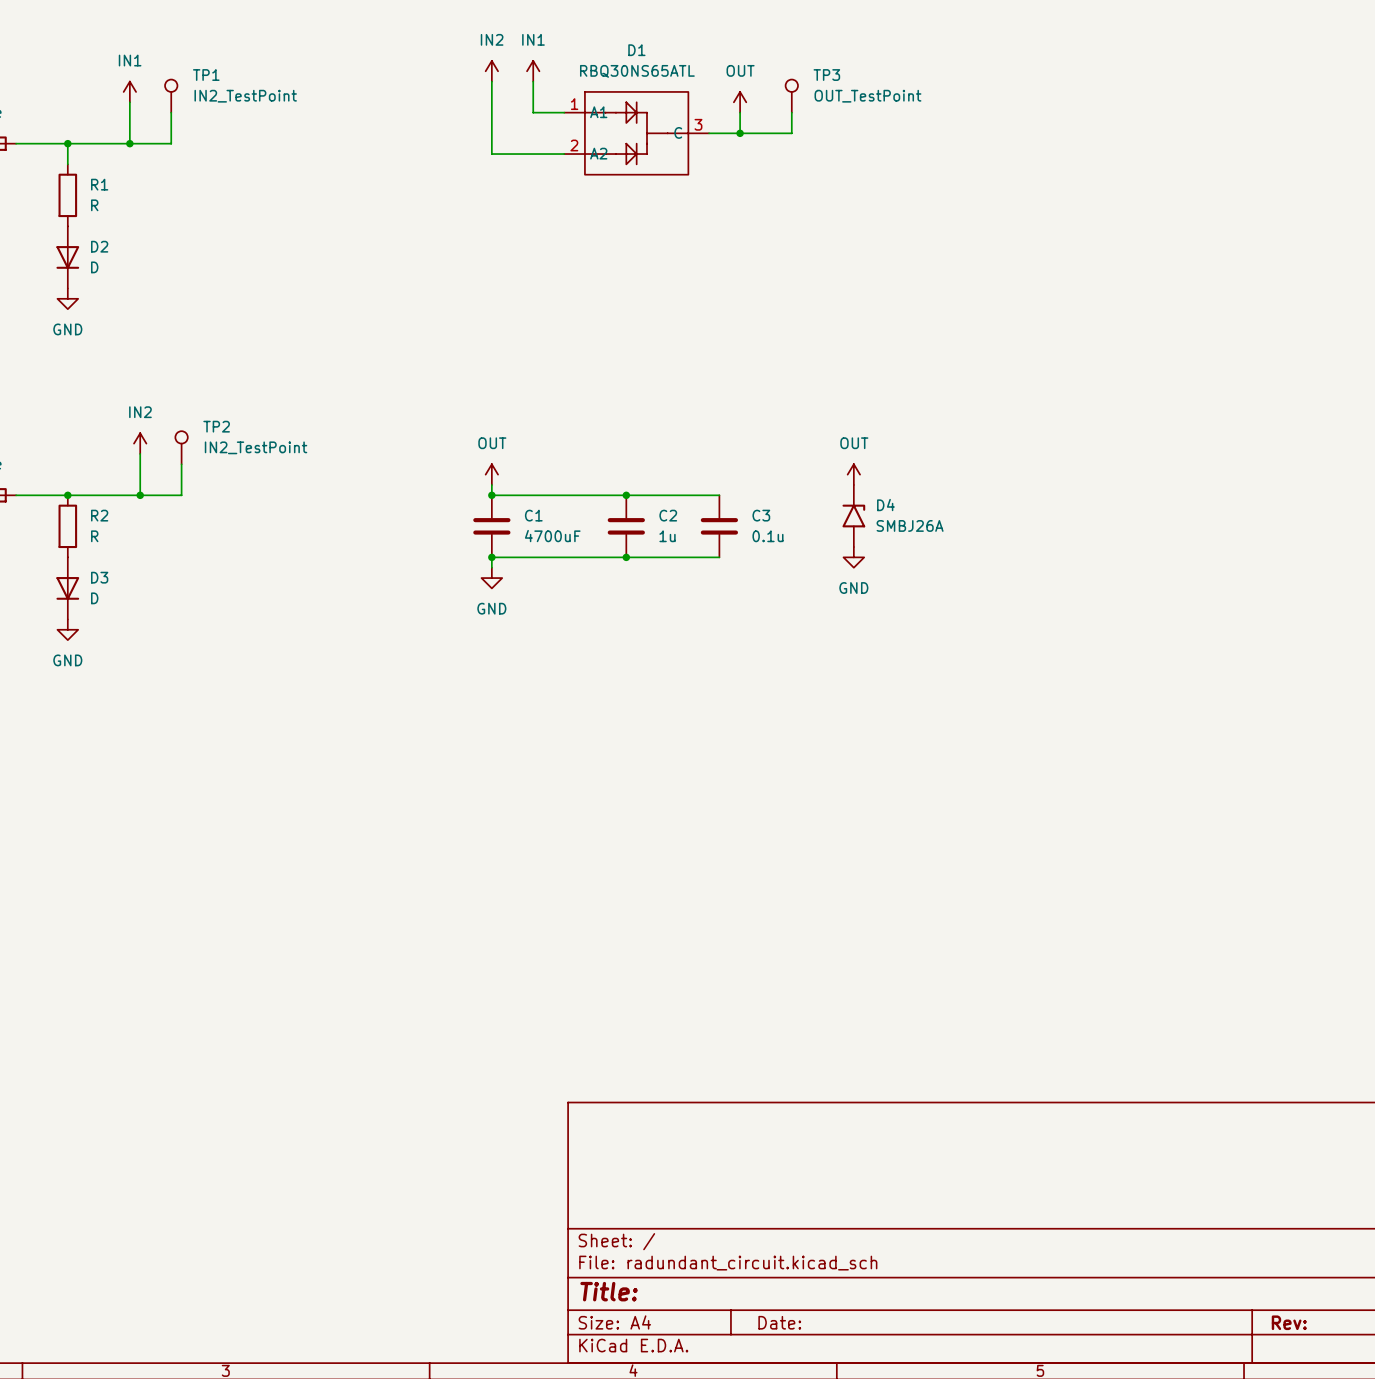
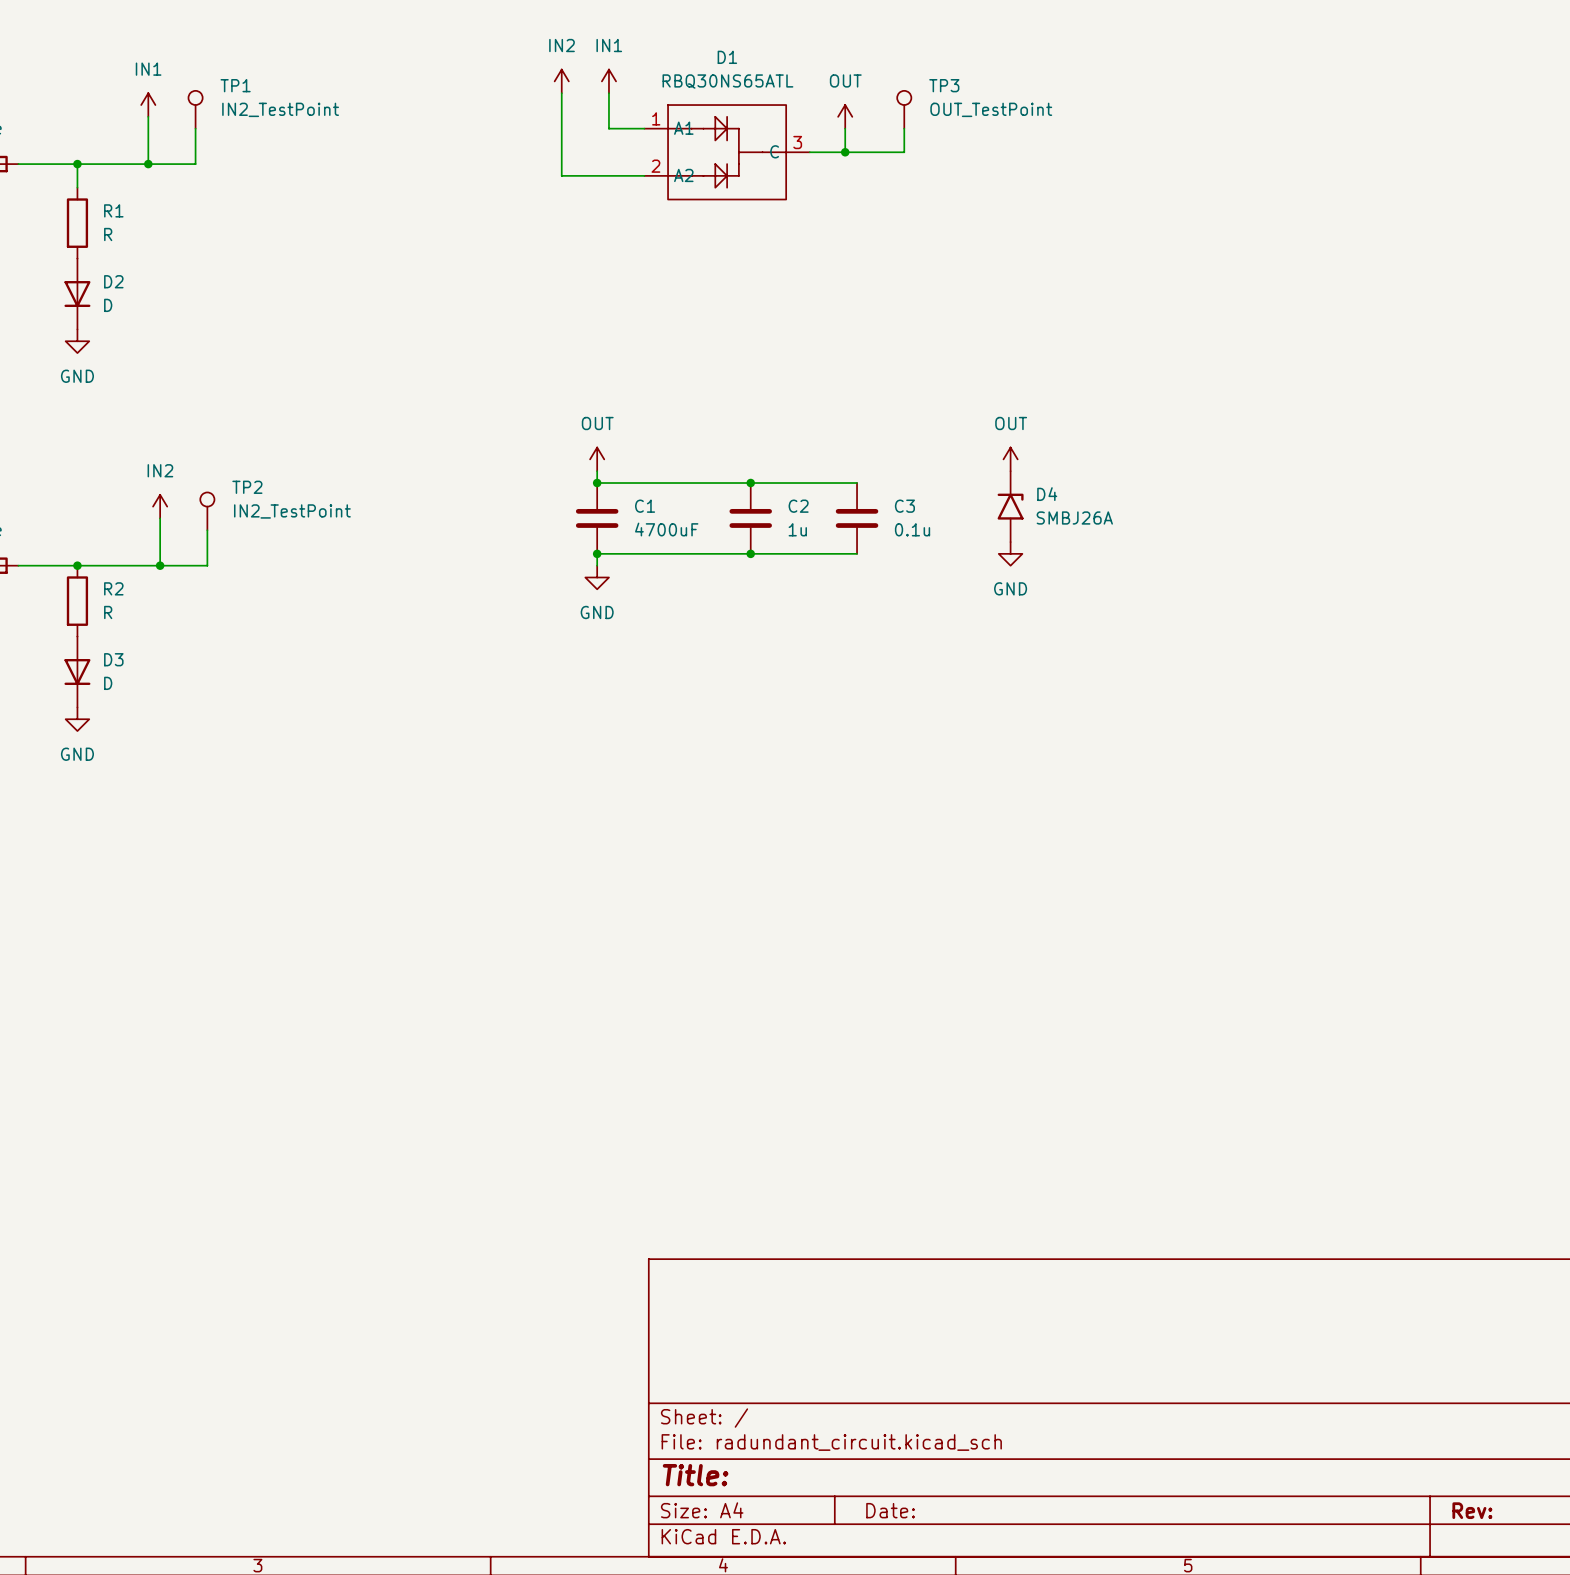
junction: none -> (597, 483)
junction: none -> (750, 483)
power symbol position: OUT (491, 474) -> OUT (597, 459)
power symbol position: OUT (853, 474) -> OUT (1010, 459)
wire: (491, 484) (491, 495) (719, 495) -> (597, 471) (597, 483) (857, 483)
junction position: (491, 495) -> (597, 553)
junction position: (626, 495) -> (750, 553)
D4 position: (853, 516) -> (1010, 506)
C1 position: (491, 526) -> (597, 518)
C2 position: (626, 526) -> (750, 518)
C3 position: (719, 526) -> (857, 518)
junction: (491, 557) -> none
junction: (626, 557) -> none
wire: (719, 557) (491, 557) (491, 567) -> (857, 553) (597, 553) (597, 565)
power symbol position: GND (853, 557) -> GND (1010, 553)
power symbol position: GND (491, 578) -> GND (597, 577)

